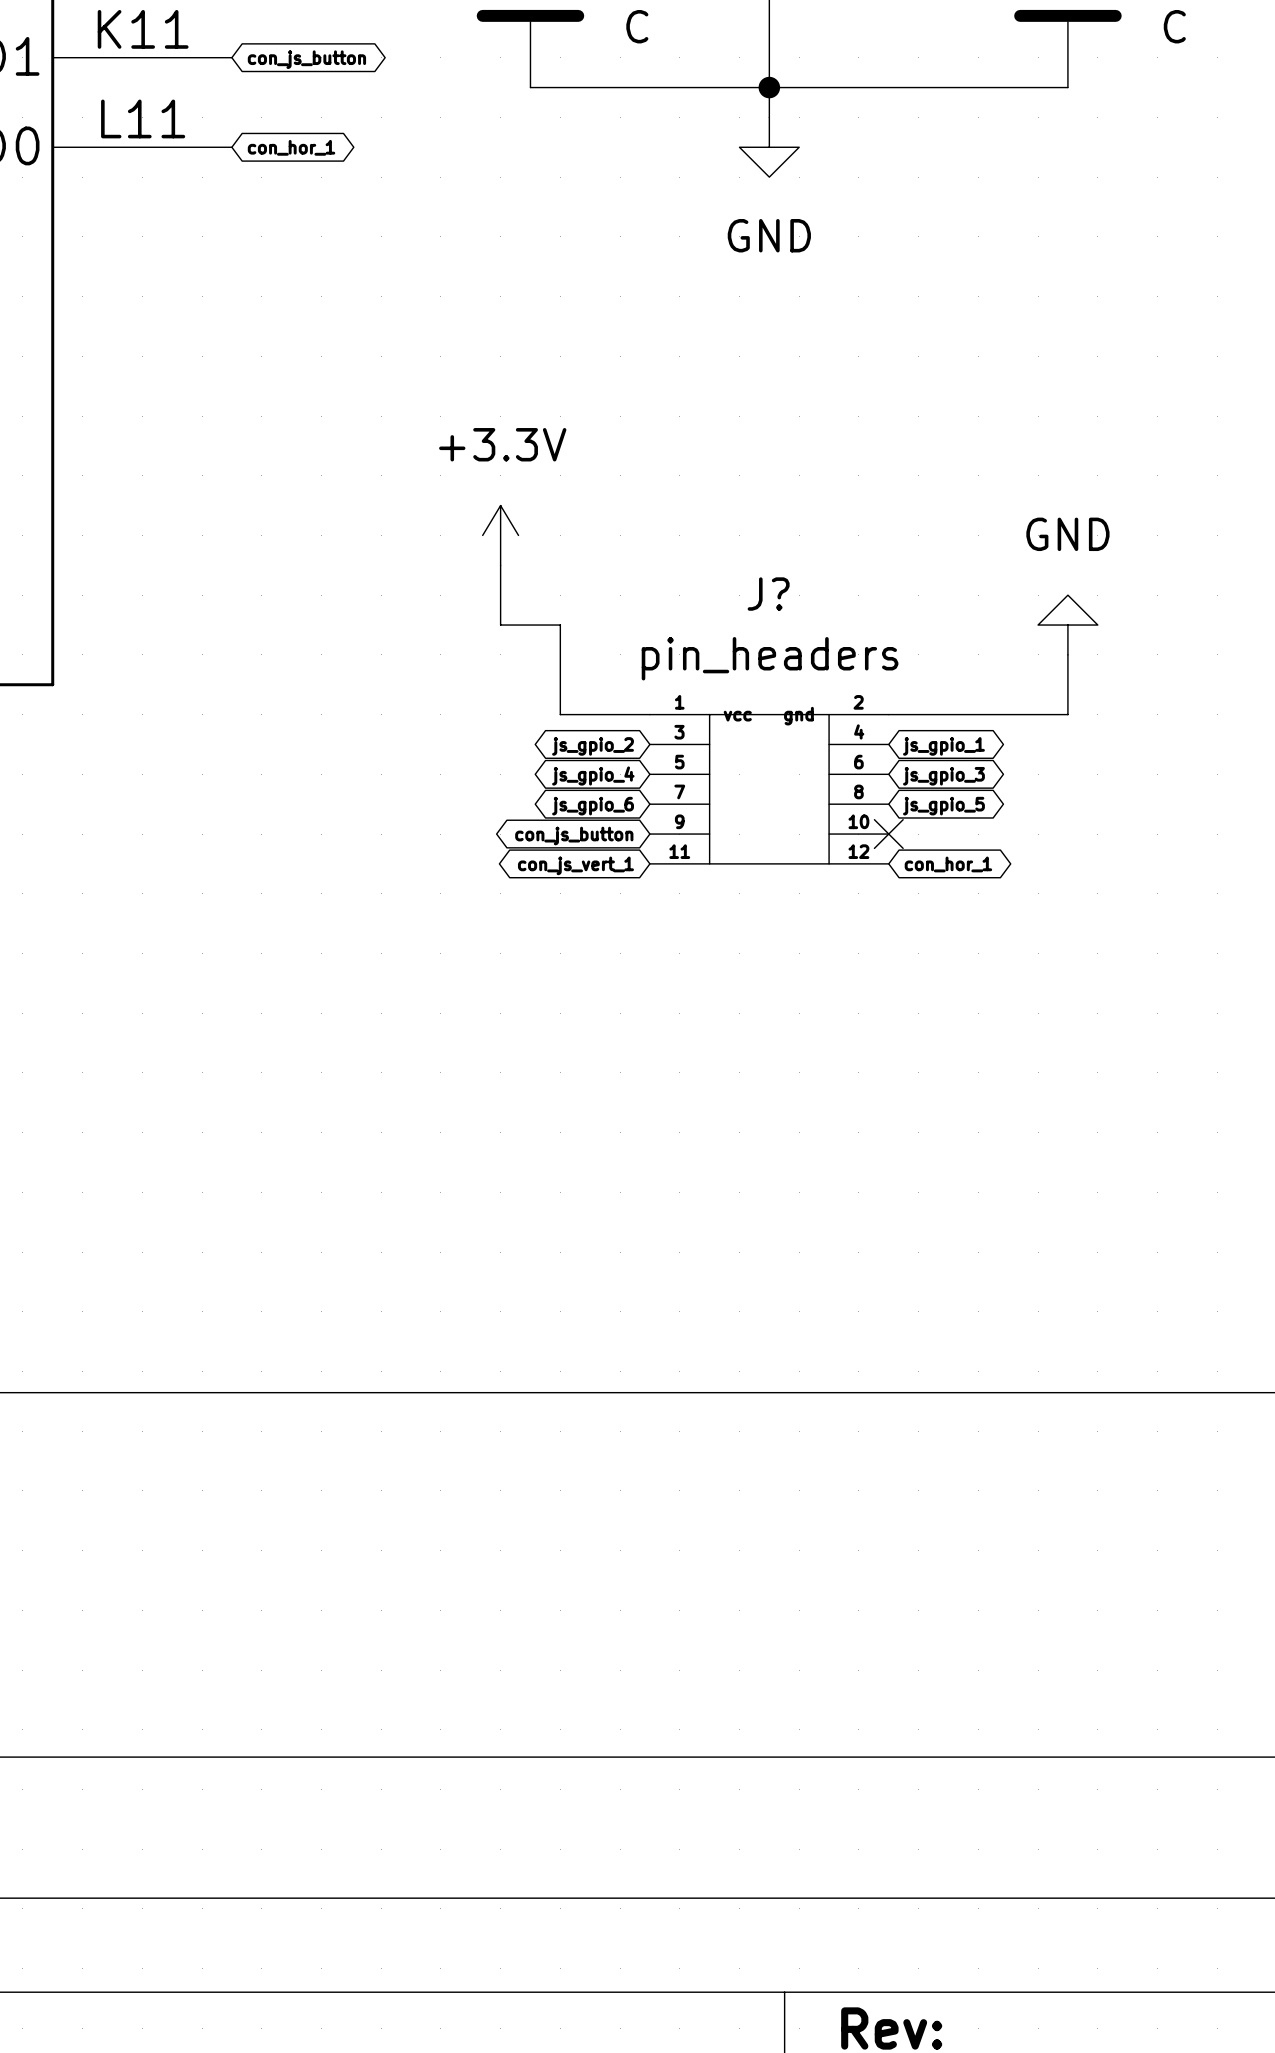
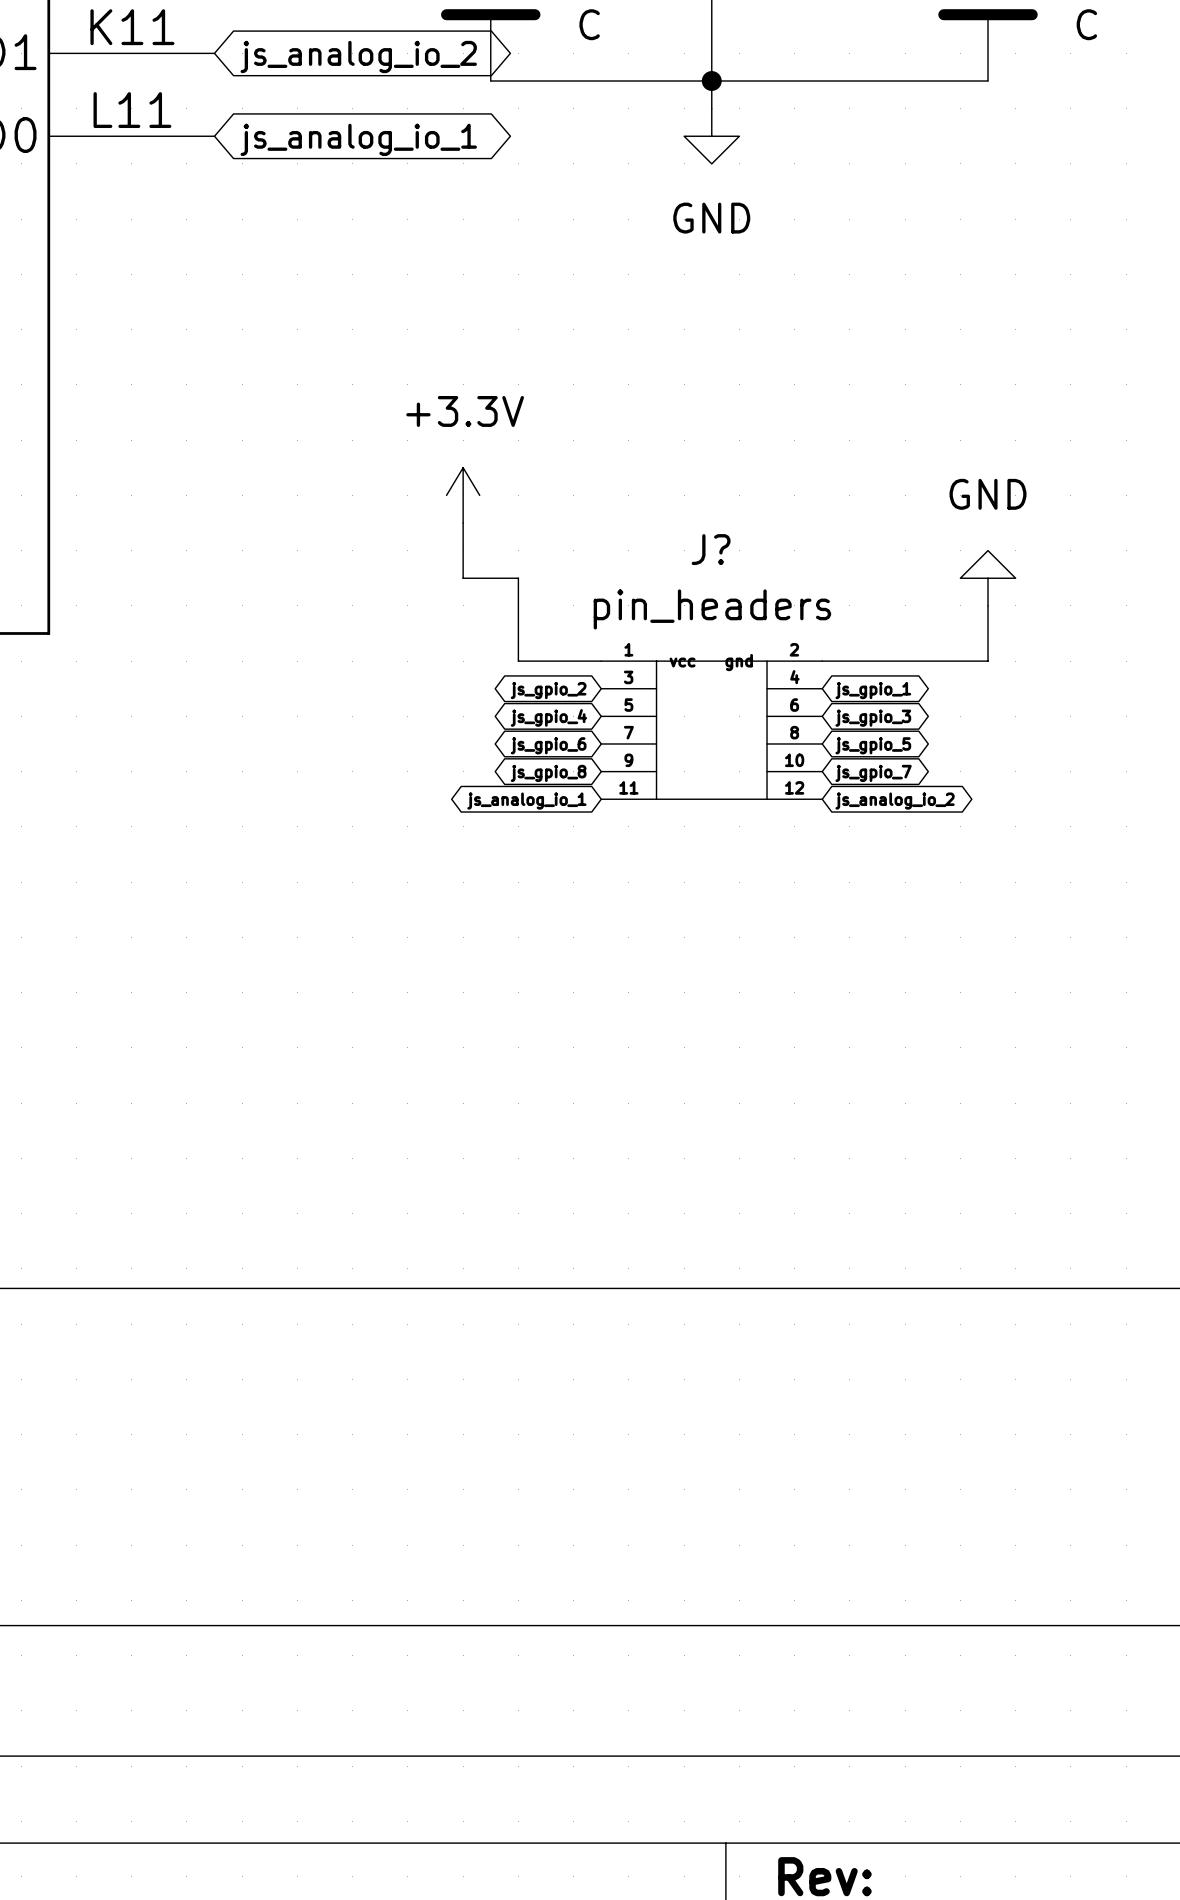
global label: con_js_button (306, 59) -> js_analog_io_2 (358, 57)
global label: con_hor_1 (291, 147) -> js_analog_io_1 (358, 139)
no-connect mark: (888, 834) -> none
global label: con_js_button (574, 836) -> js_gpio_8 (548, 773)
global label: none -> js_gpio_7 (873, 773)
global label: con_hor_1 (948, 864) -> js_analog_io_2 (895, 801)
global label: con_js_vert_1 (575, 865) -> js_analog_io_1 (526, 801)

